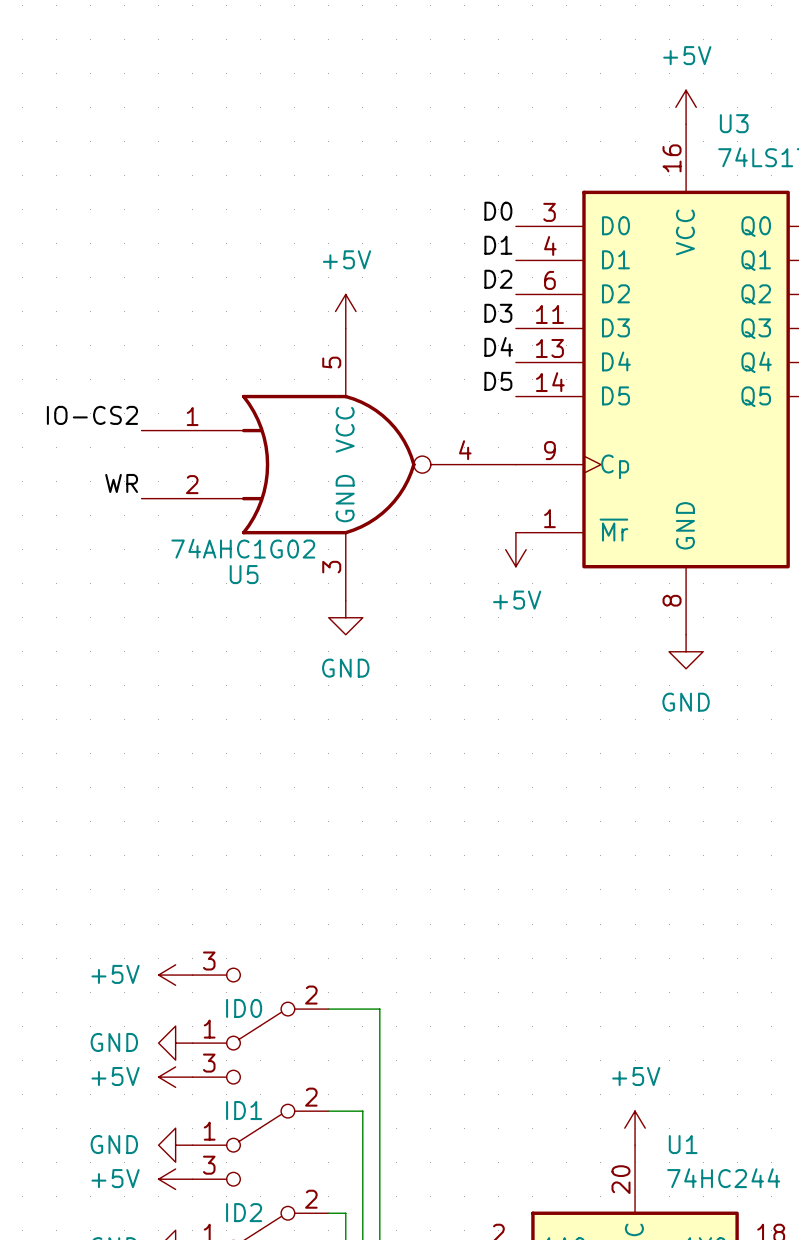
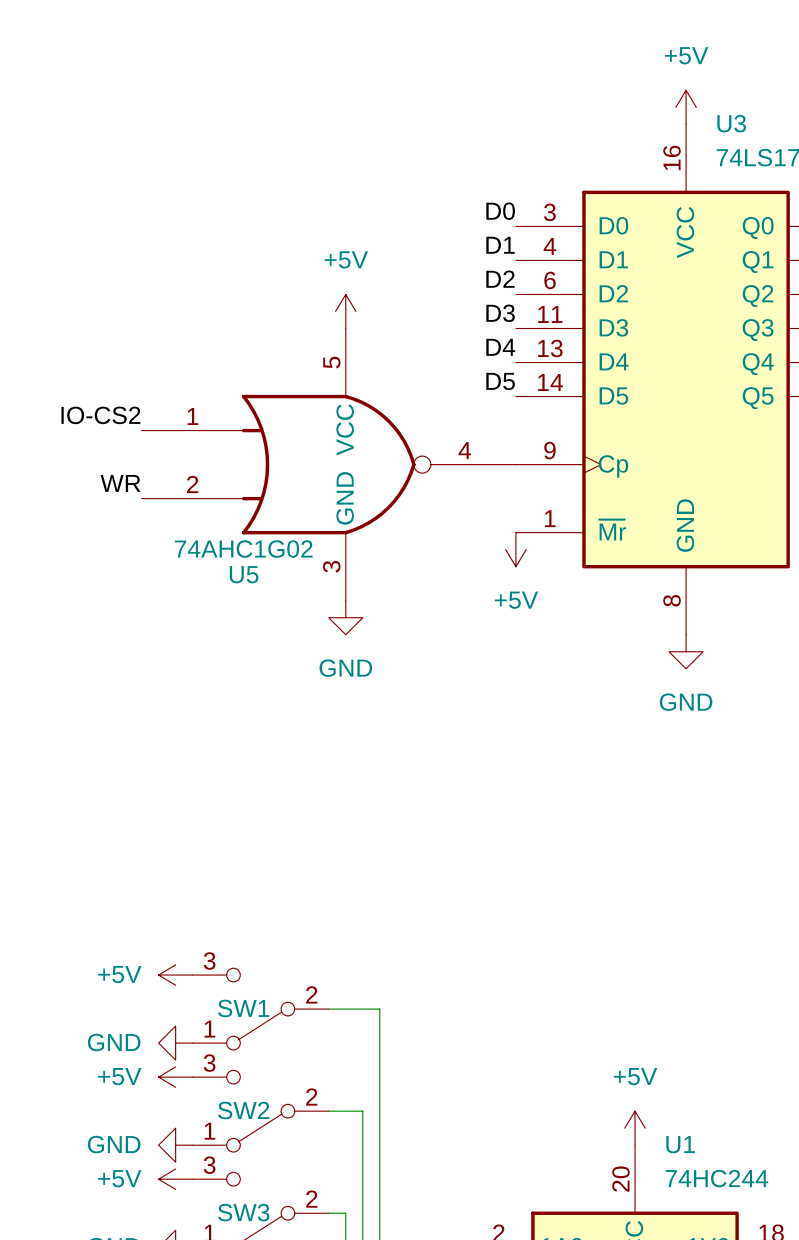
ID0 name: ID0 (244, 1008) -> SW1 (243, 1008)
ID1 name: ID1 (244, 1110) -> SW2 (243, 1110)
ID2 name: ID2 (244, 1212) -> SW3 (243, 1212)

